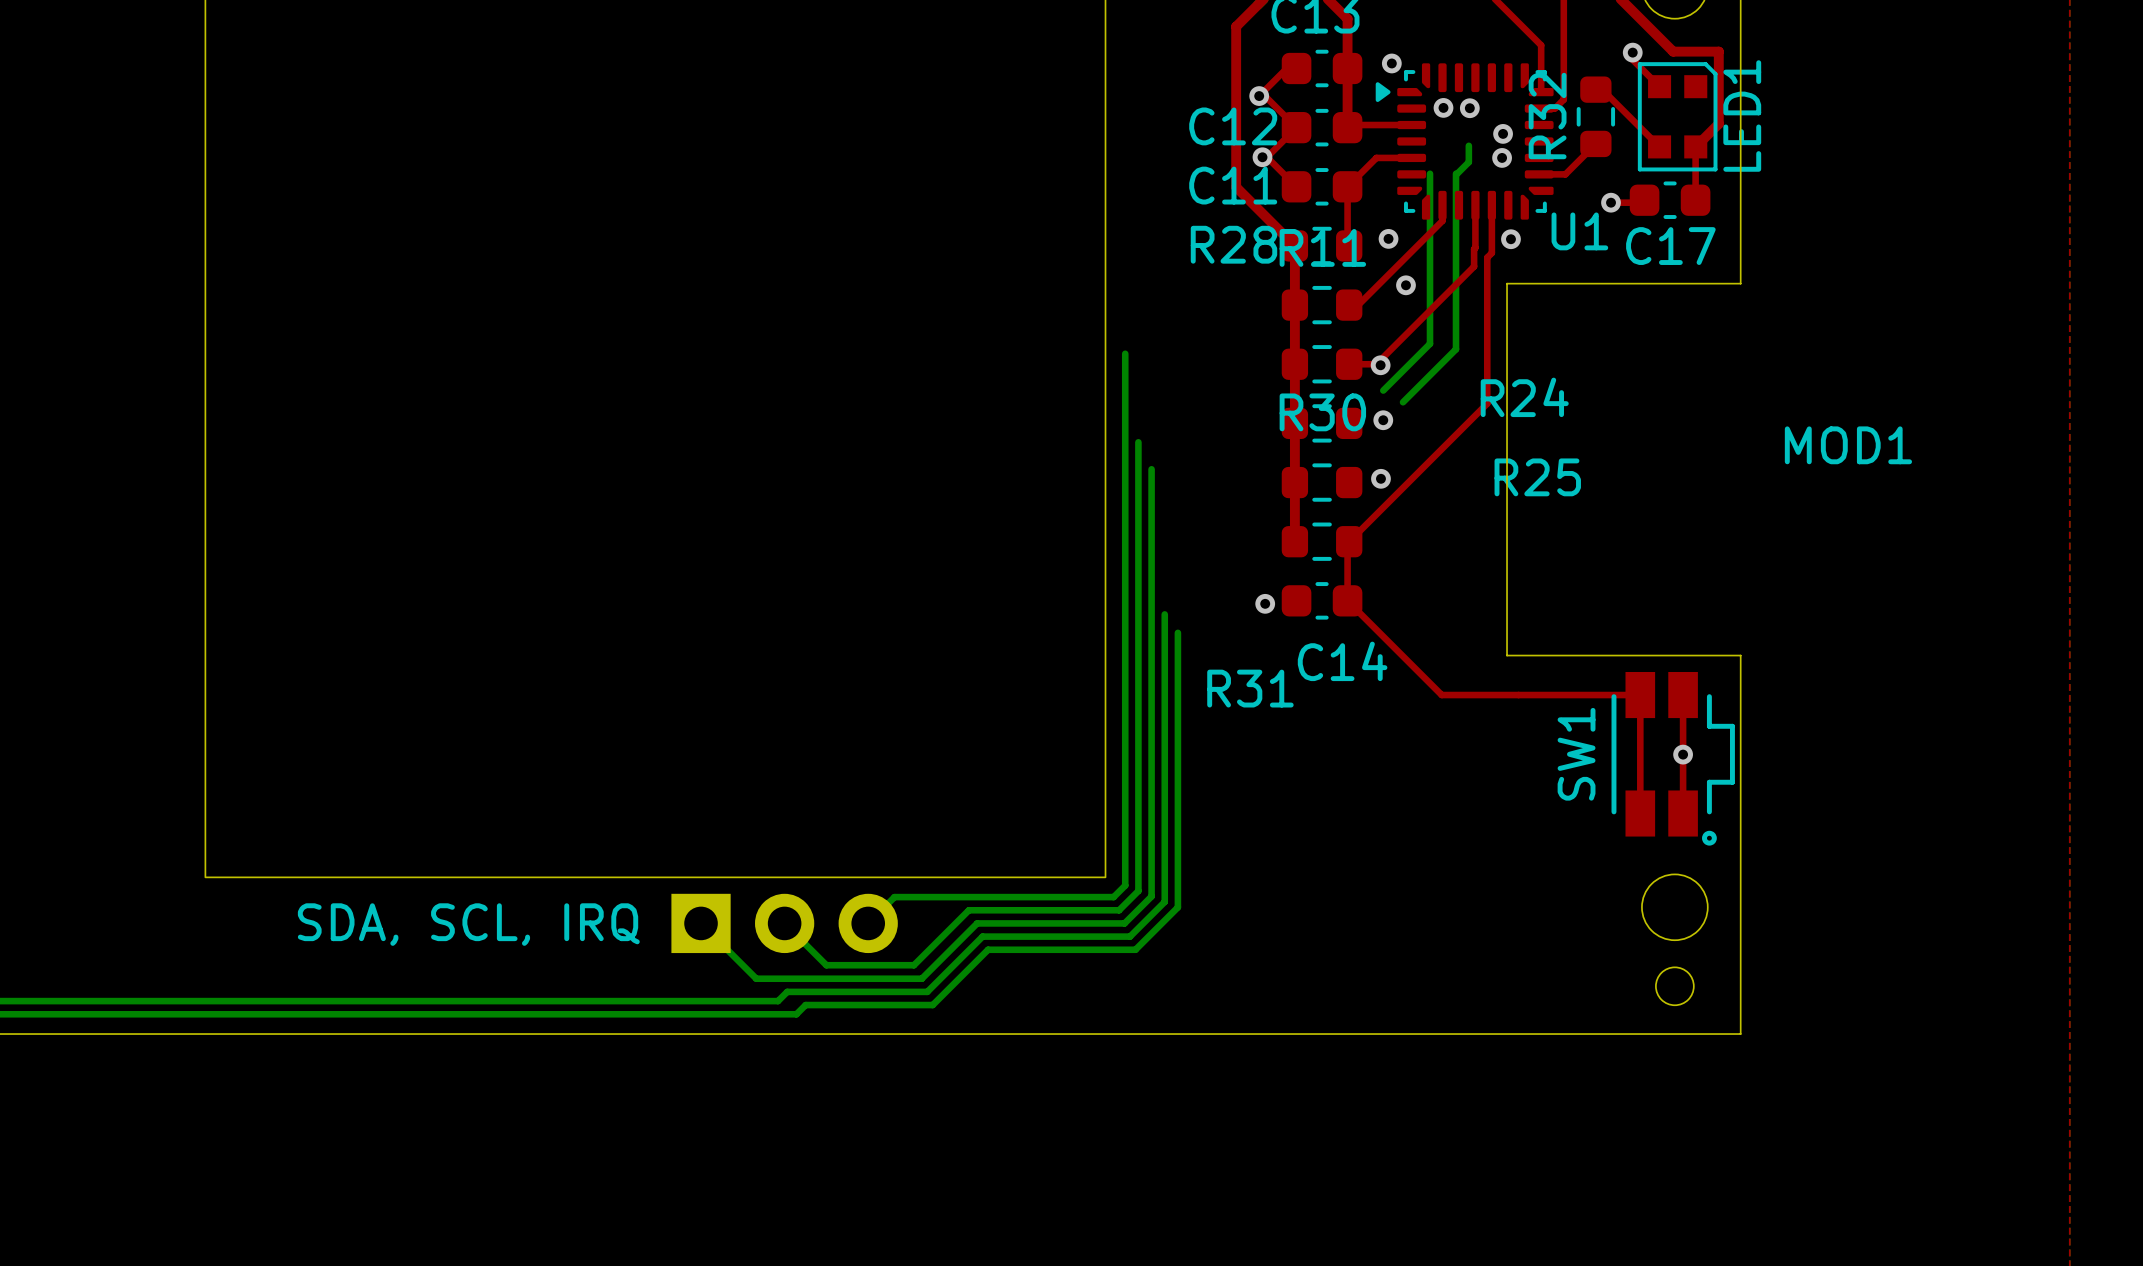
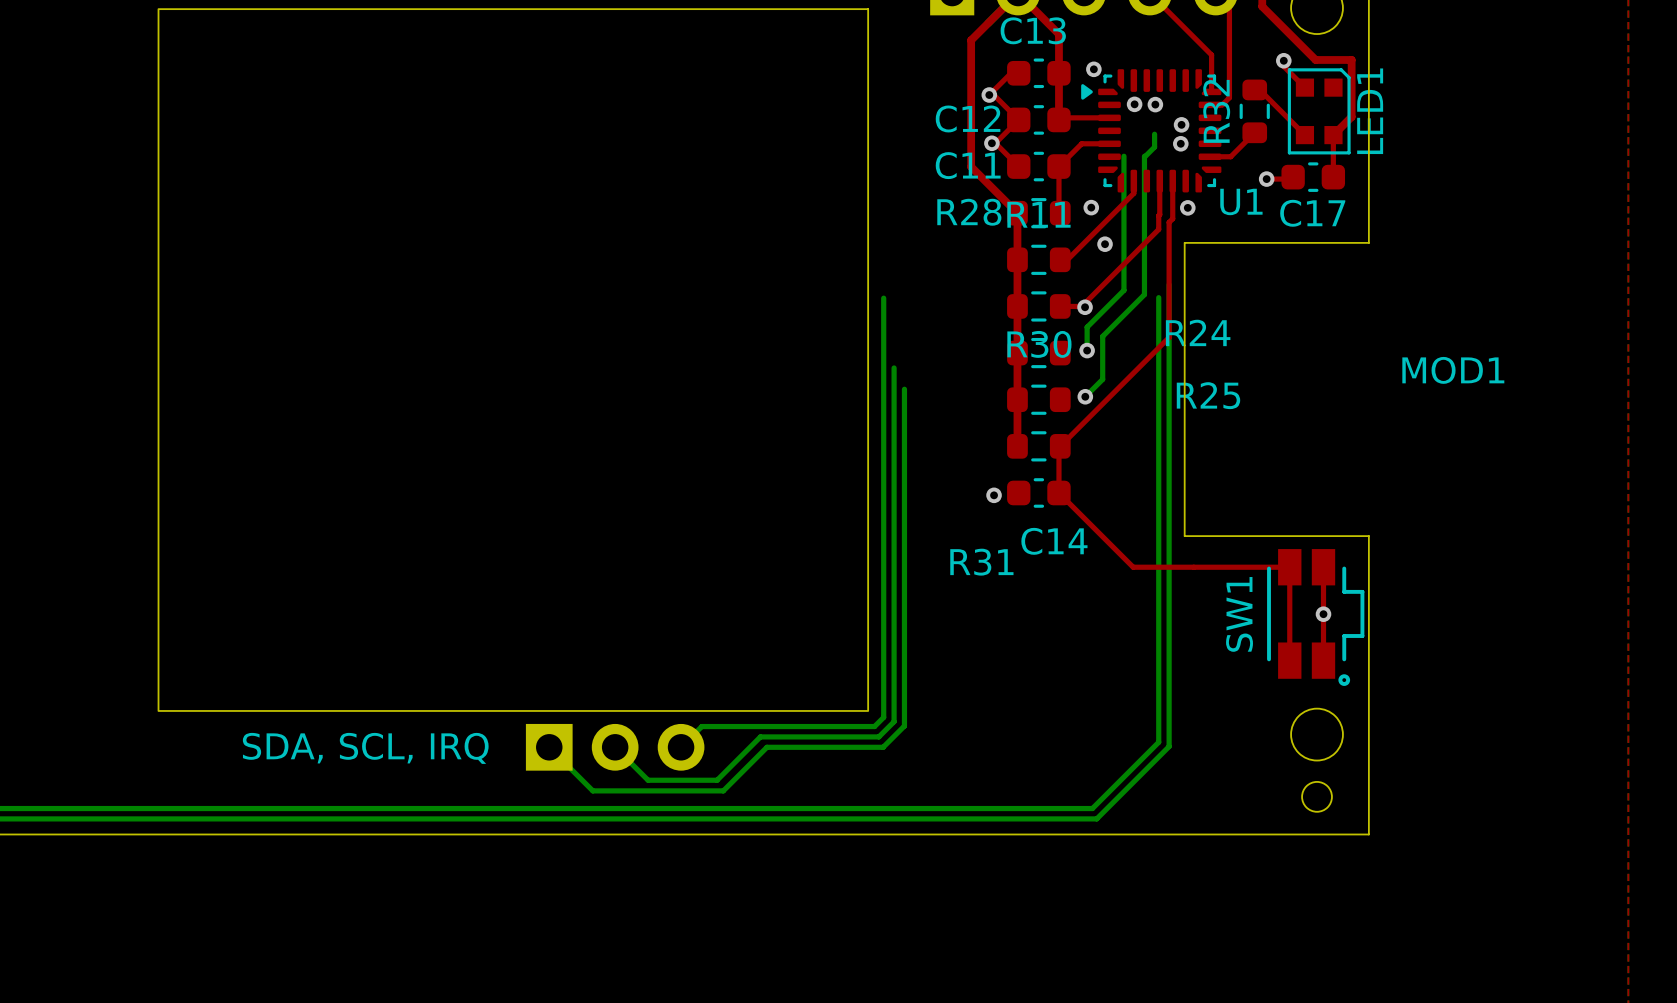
bottom track: none -> (1087, 327) (1087, 350)
bottom track: none -> (1102, 336) (1102, 379) (1085, 396)
bottom track: (1164, 614) (1164, 901) (1130, 936) (982, 936) (927, 991) (787, 991) (778, 1001) -> (1158, 297) (1158, 742) (1092, 808) (609, 808)
bottom track: (1177, 632) (1177, 907) (1135, 949) (988, 949) (932, 1005) (805, 1005) (796, 1014) -> (1169, 284) (1169, 746) (1096, 818) (624, 818)

